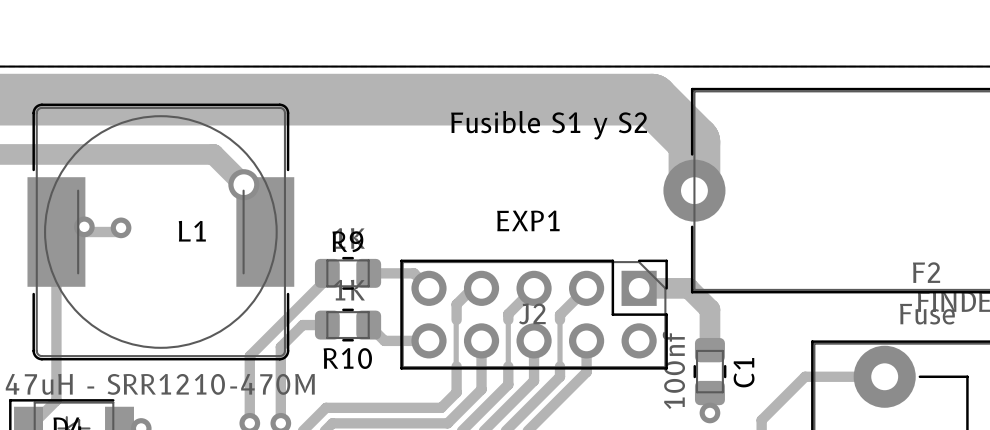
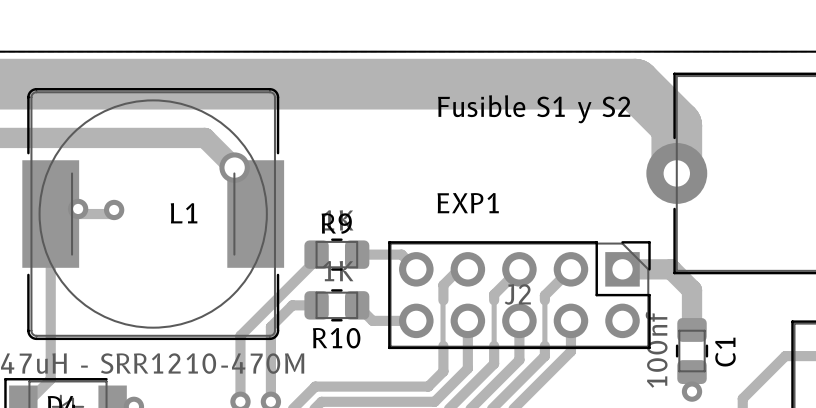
J2 value position: EXP1 (528, 220) -> EXP1 (468, 203)

